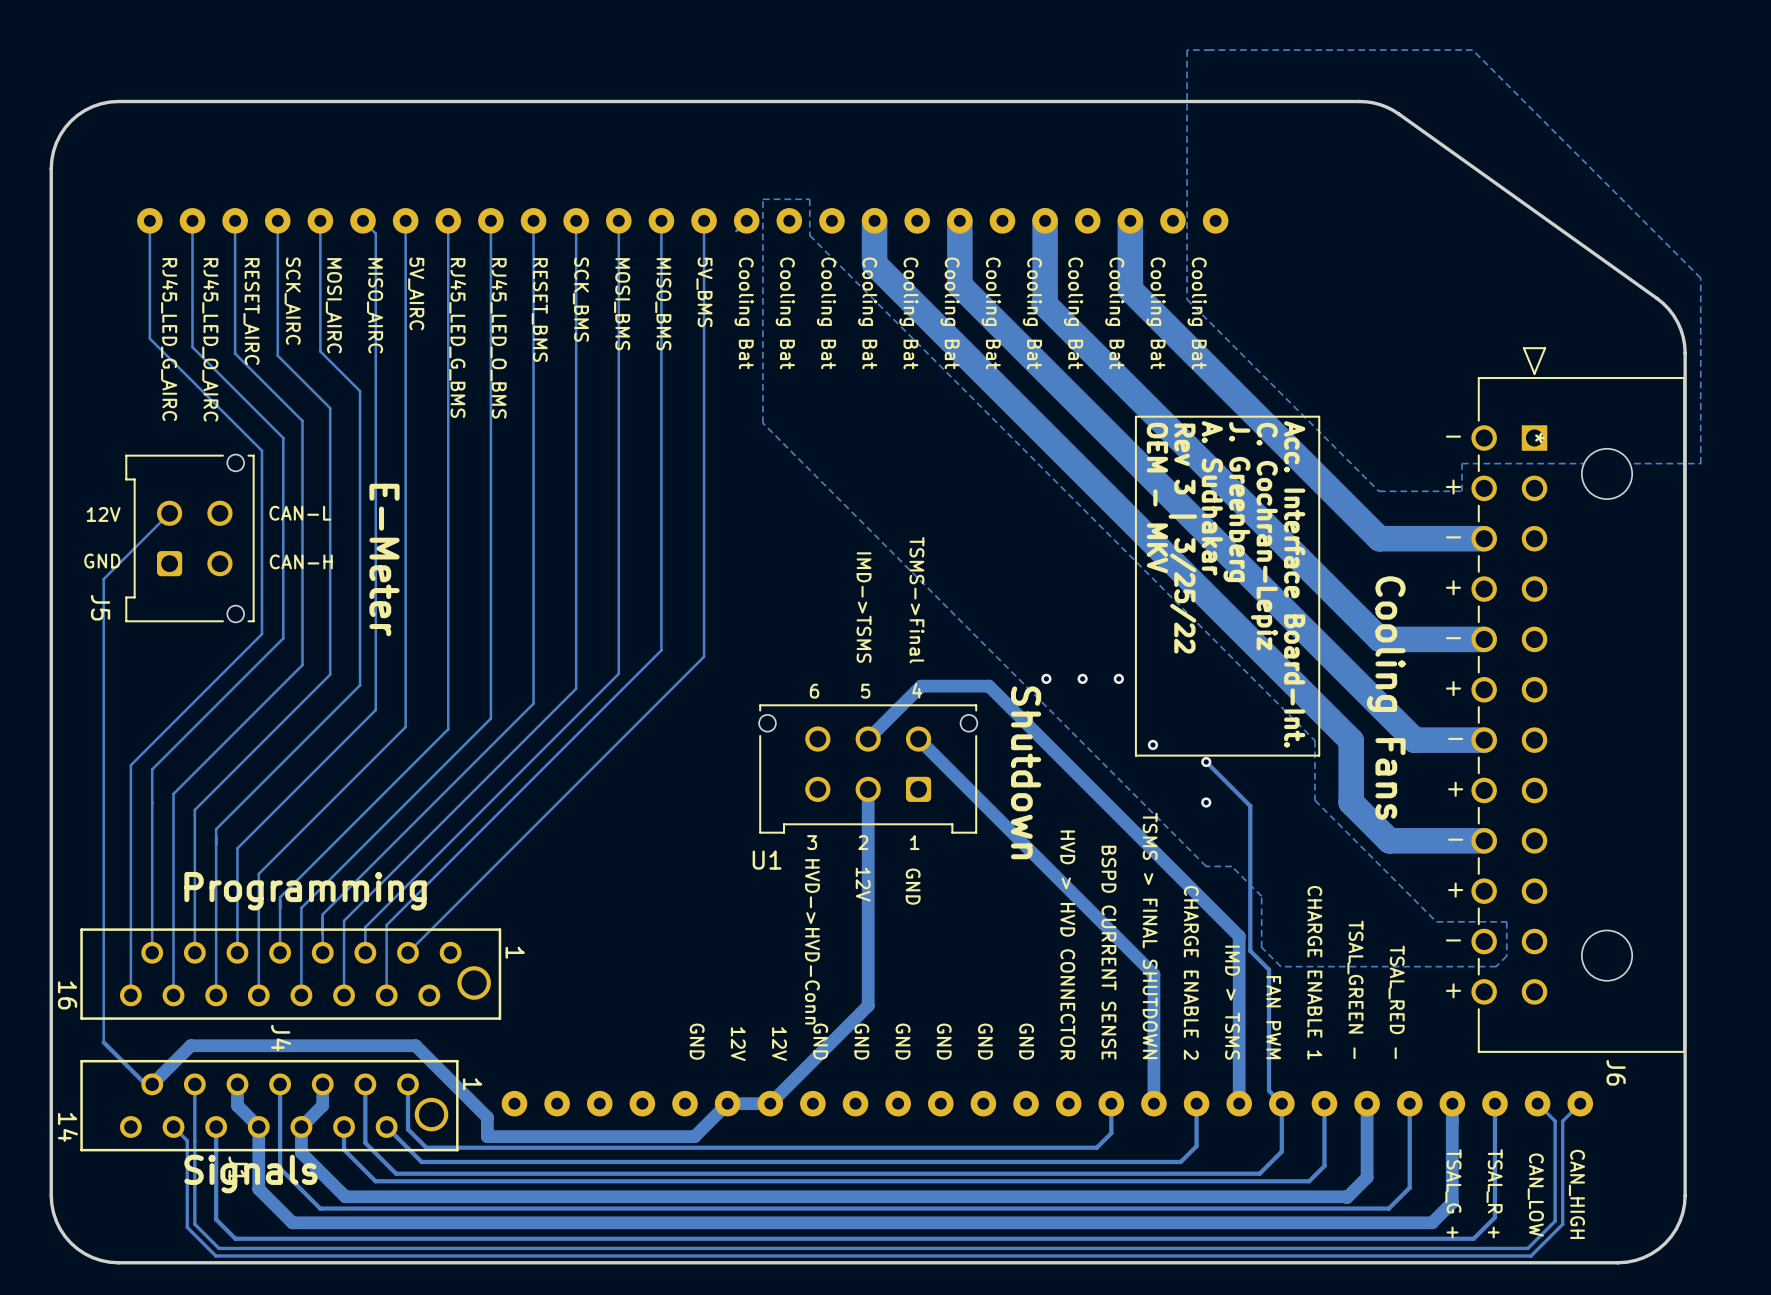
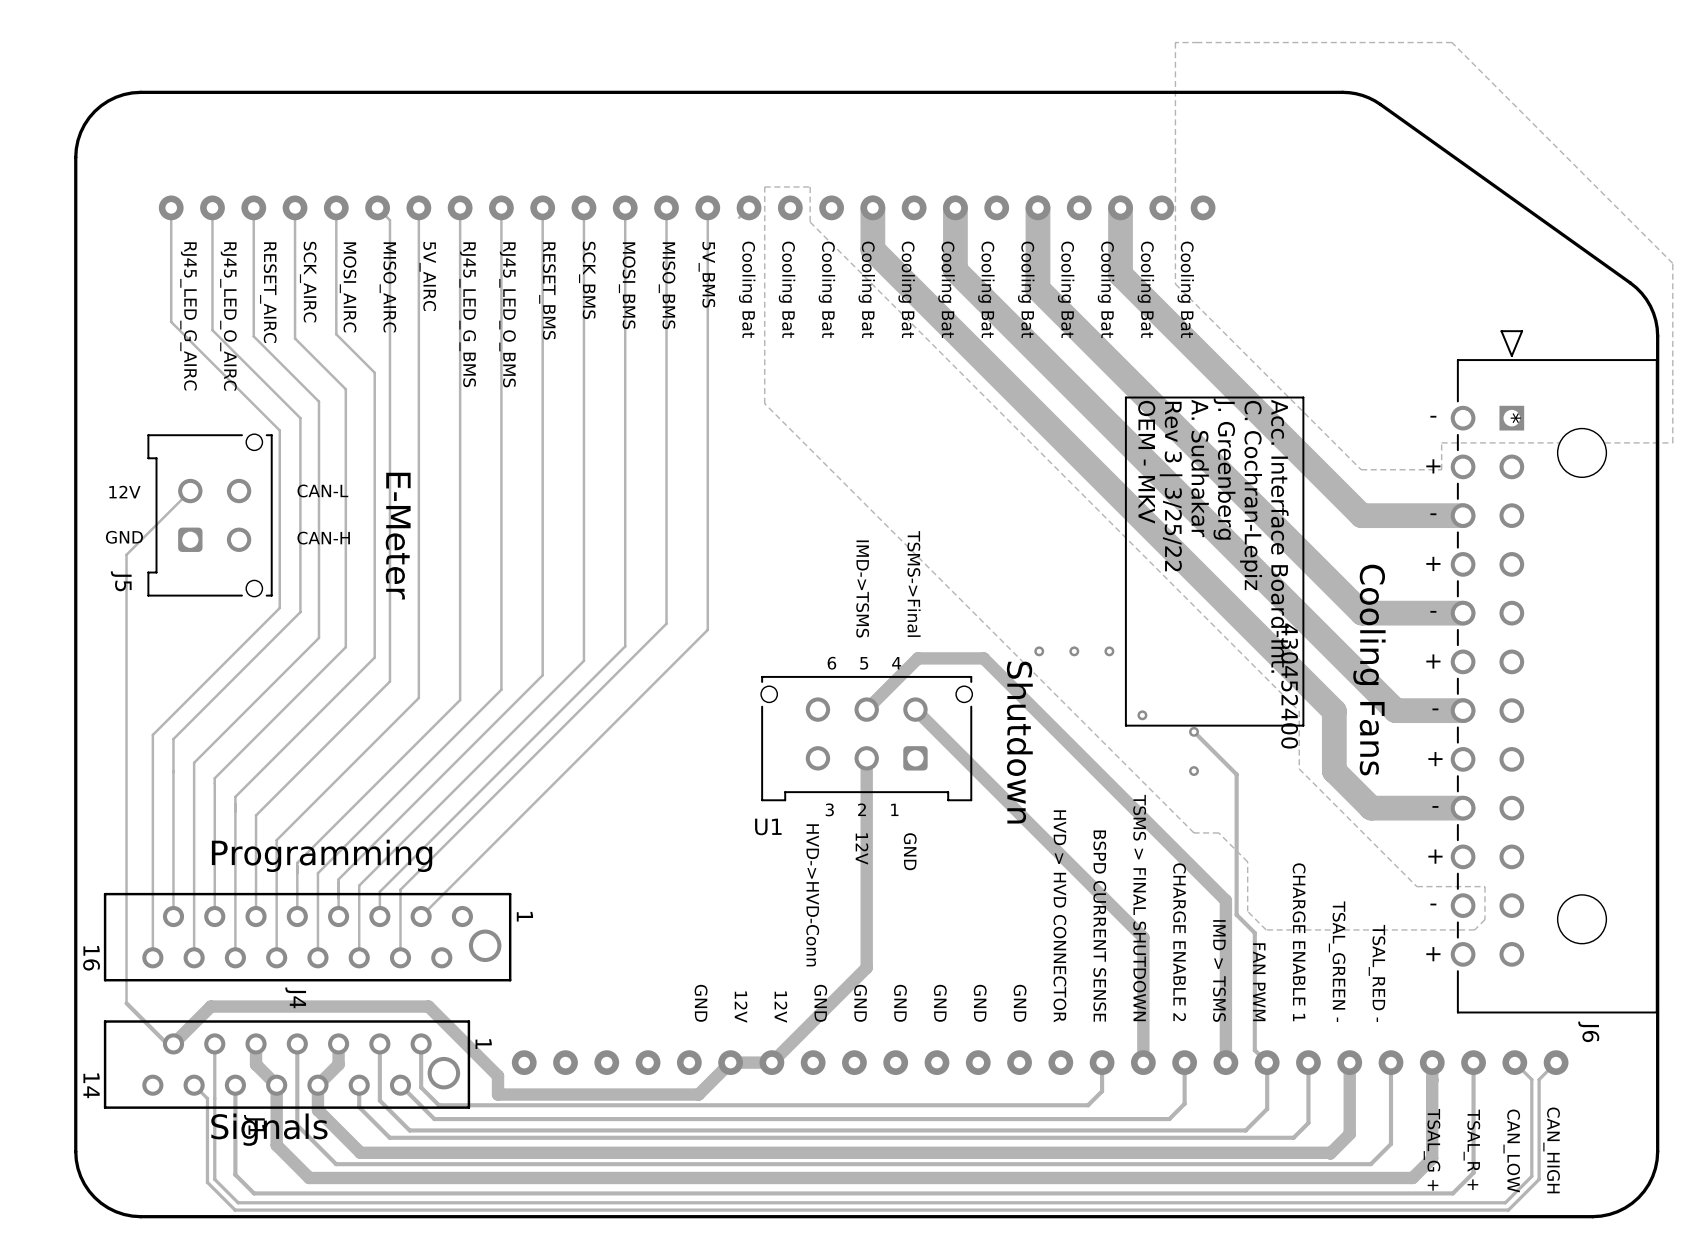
J6 text: none -> 430452400 (1289, 686)

